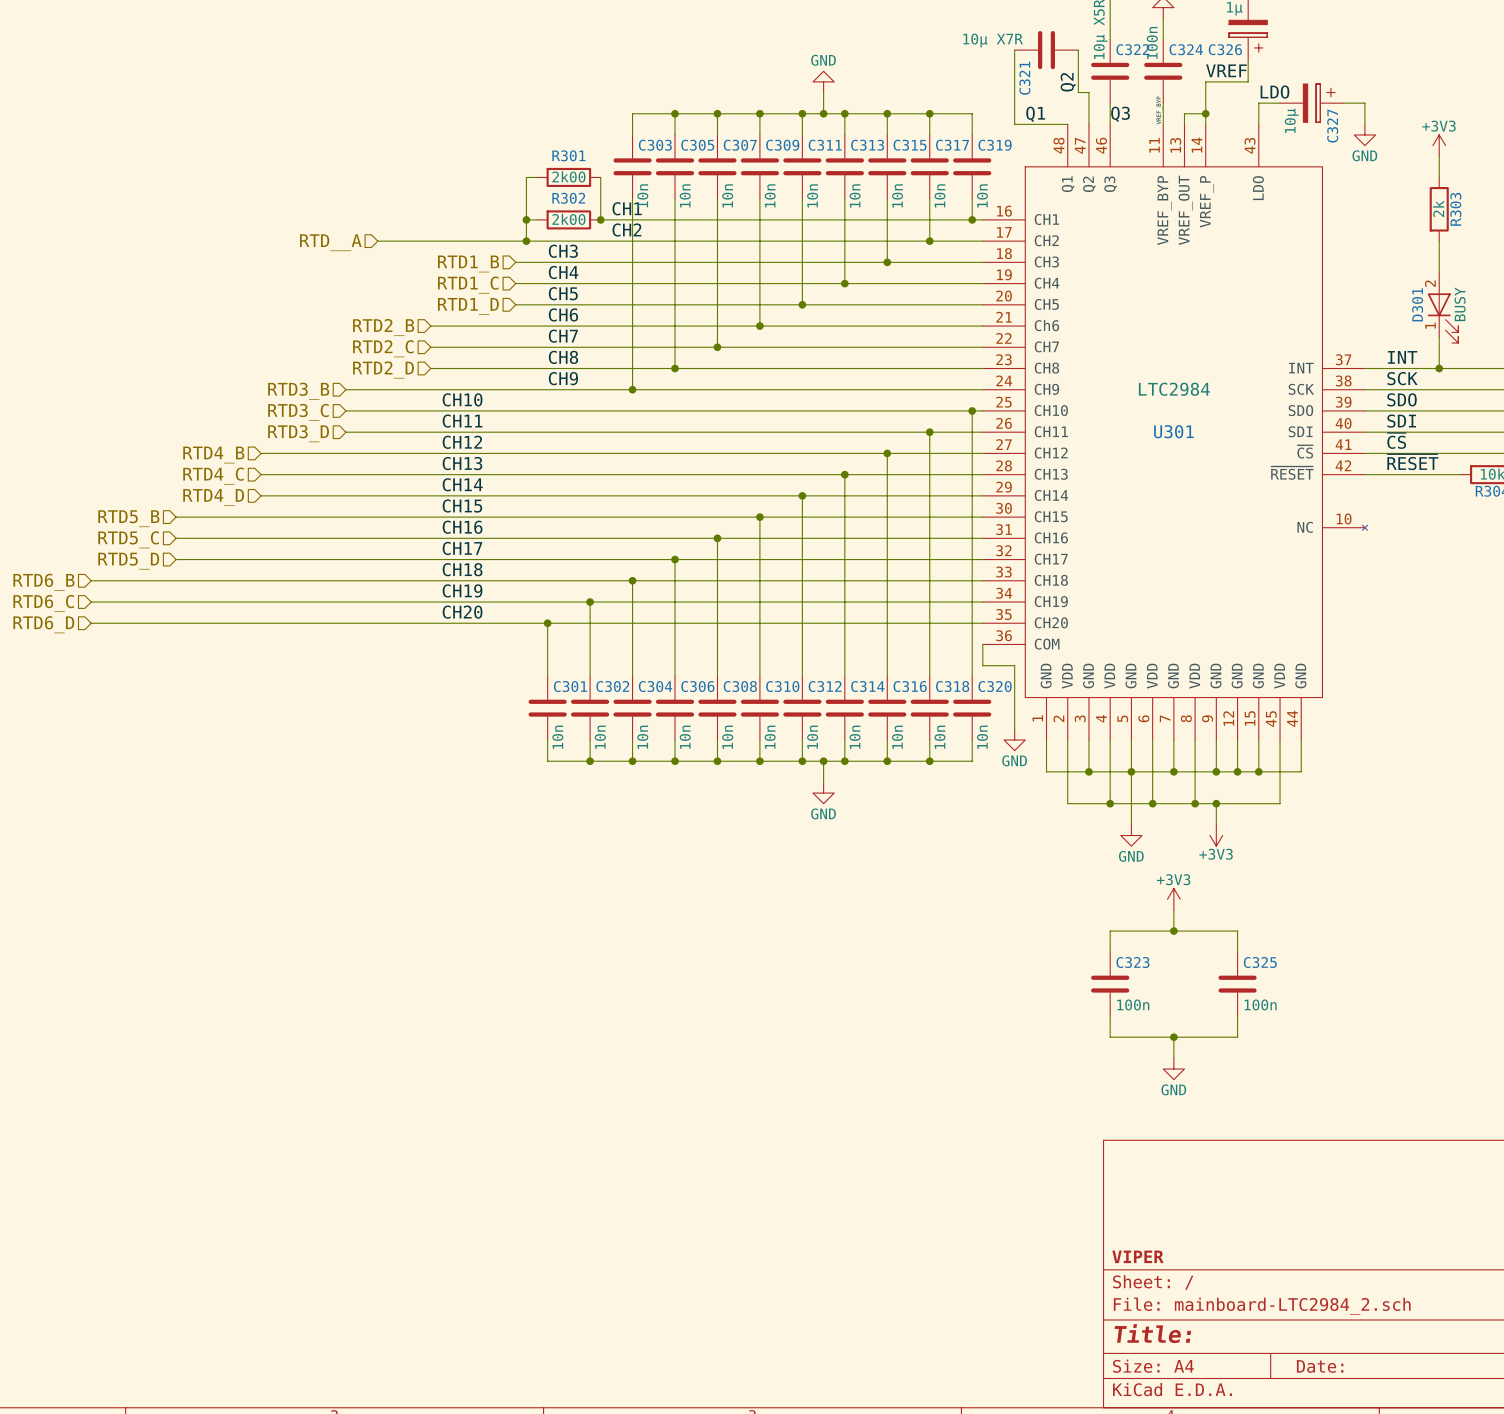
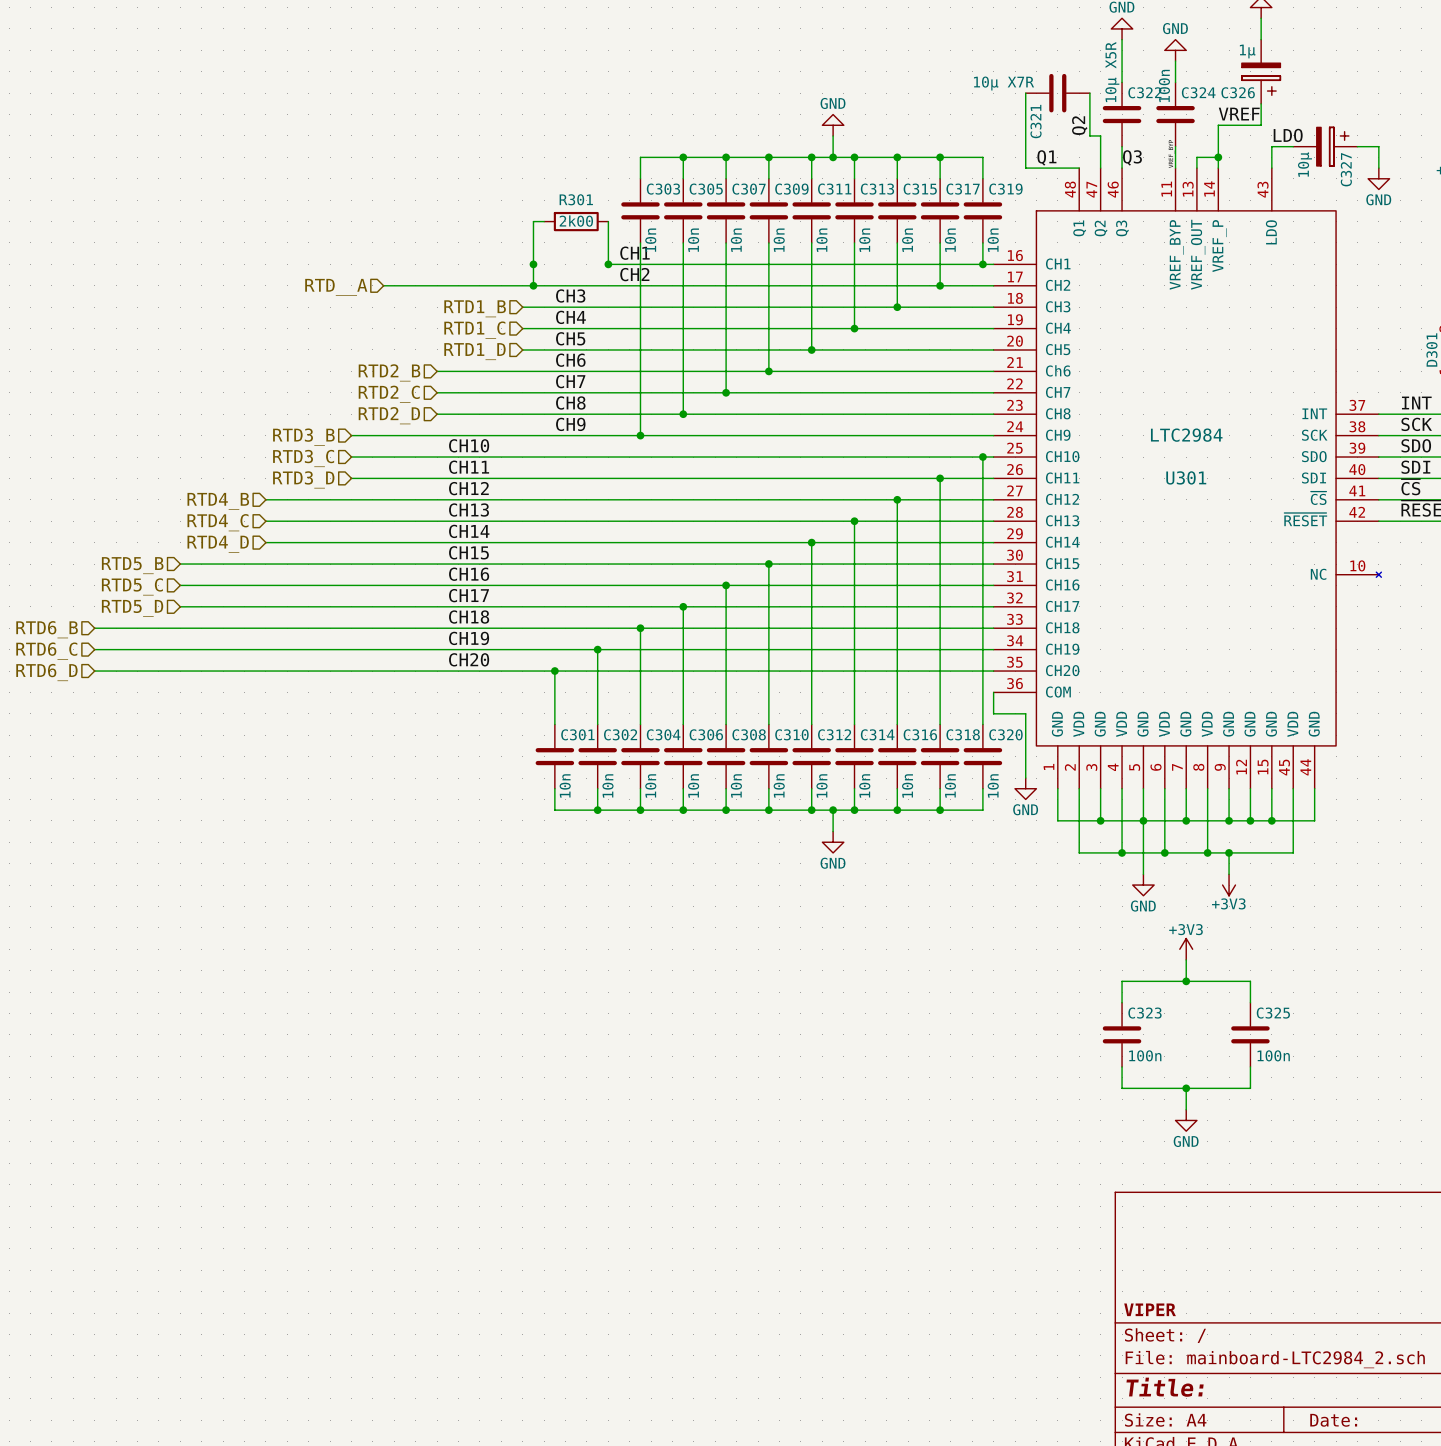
wire: (526, 219) (537, 219) -> none
R302: 2k00 (568, 219) -> none

